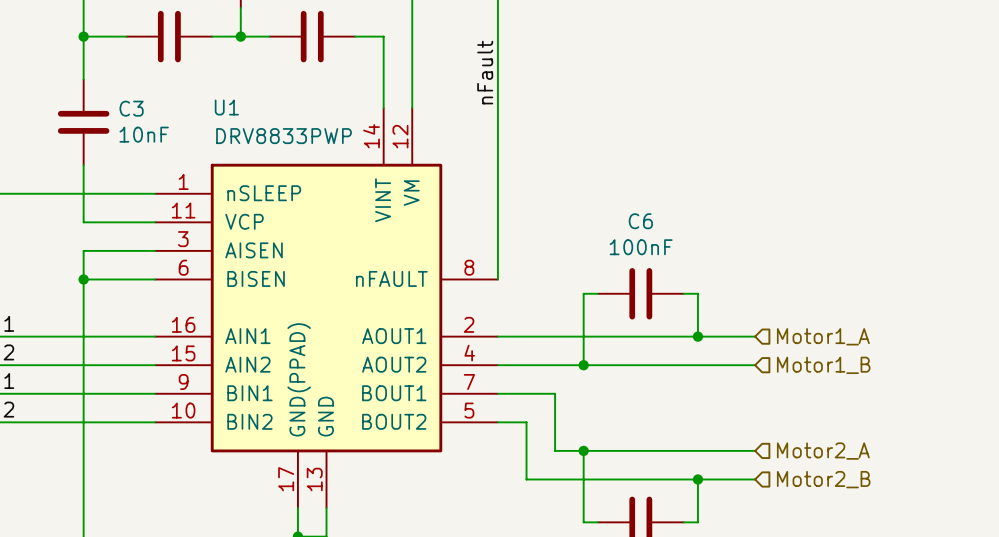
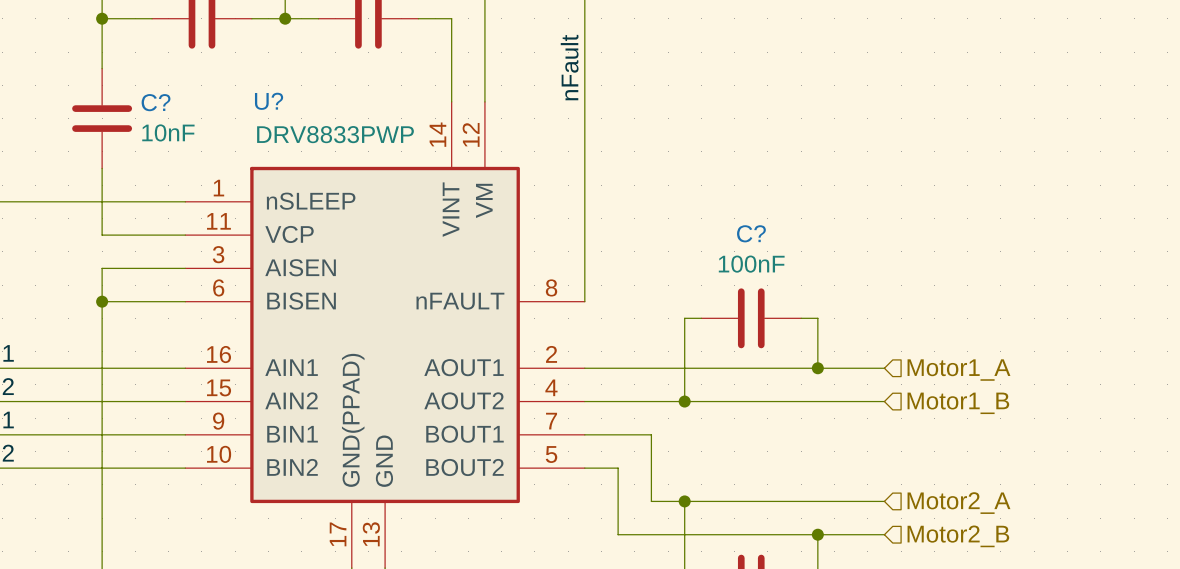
U1 name: U1 (226, 107) -> U? (269, 101)
C3 name: C3 (131, 108) -> C? (156, 102)
C6 name: C6 (640, 221) -> C? (751, 233)

